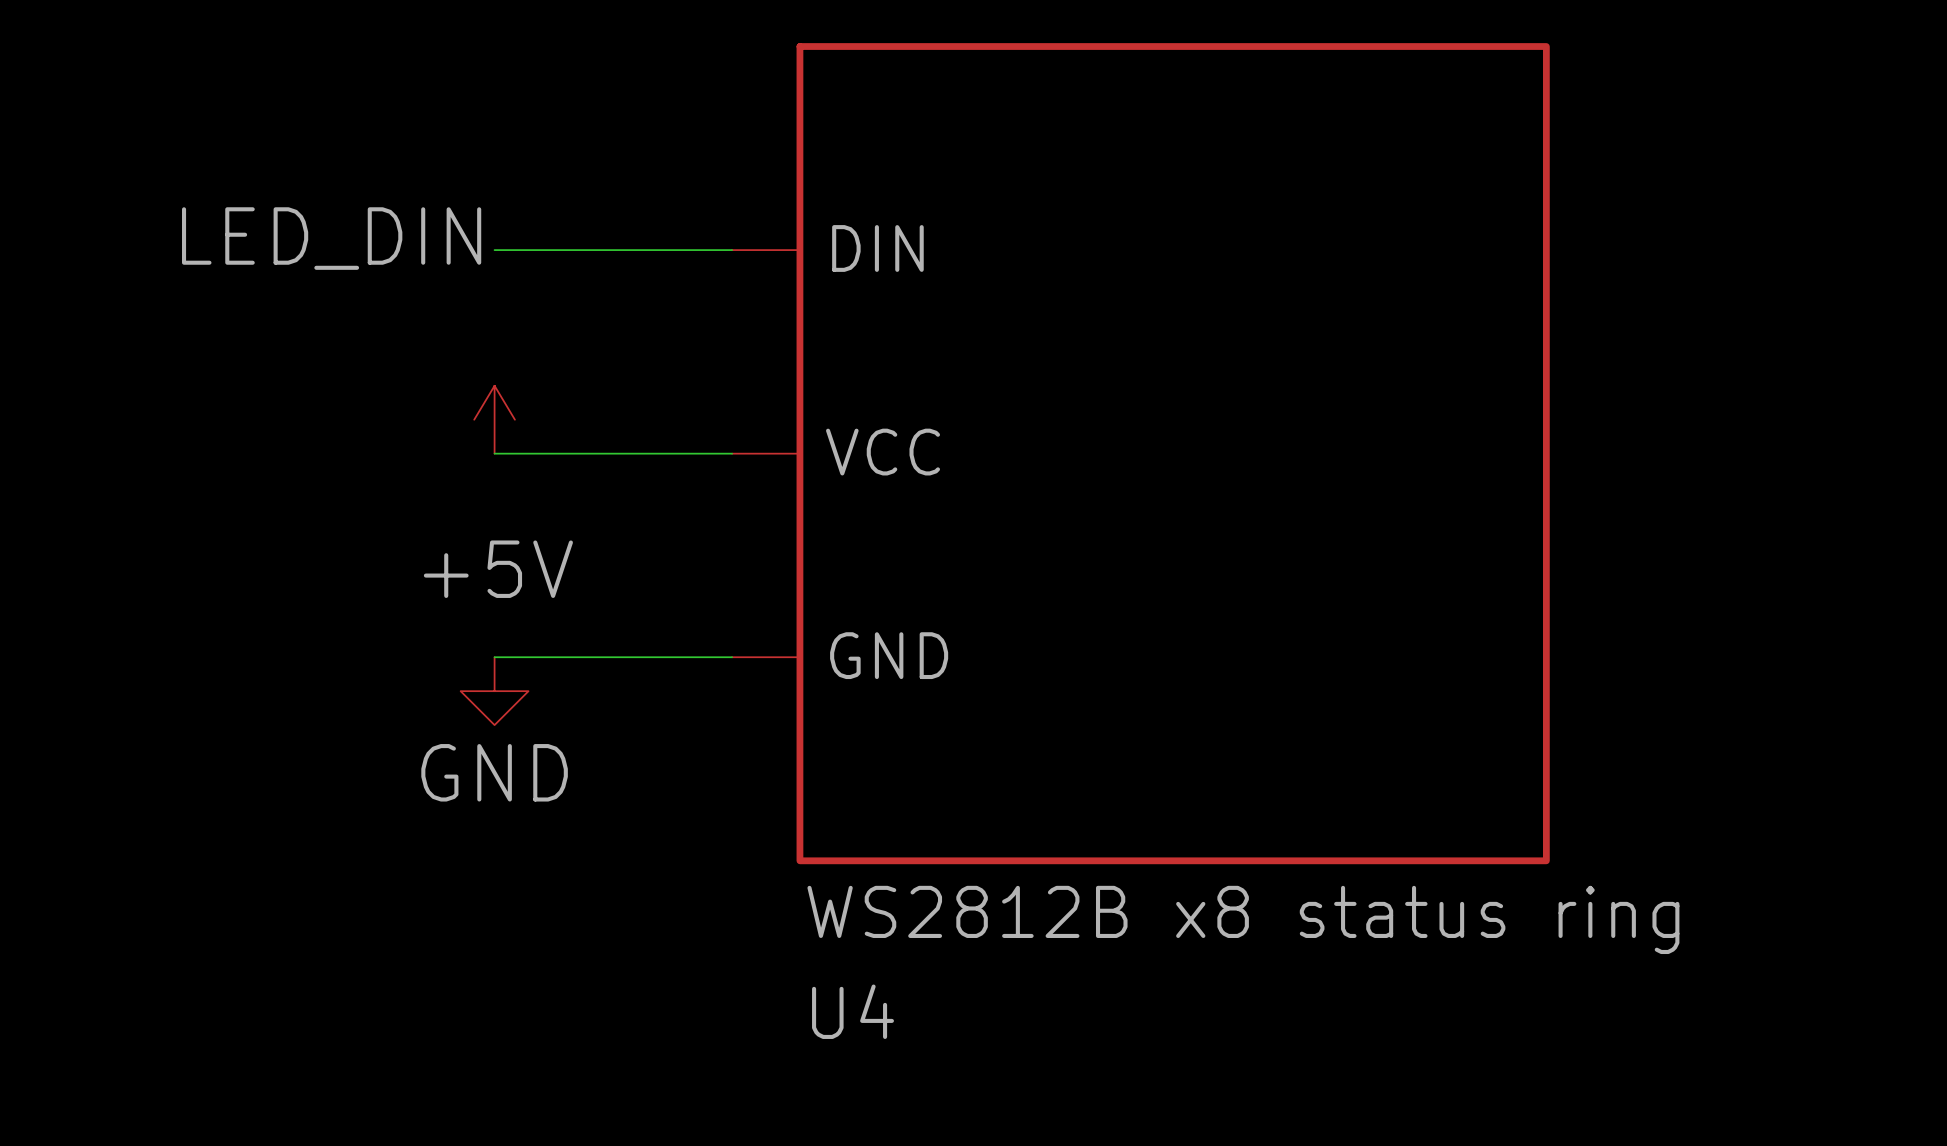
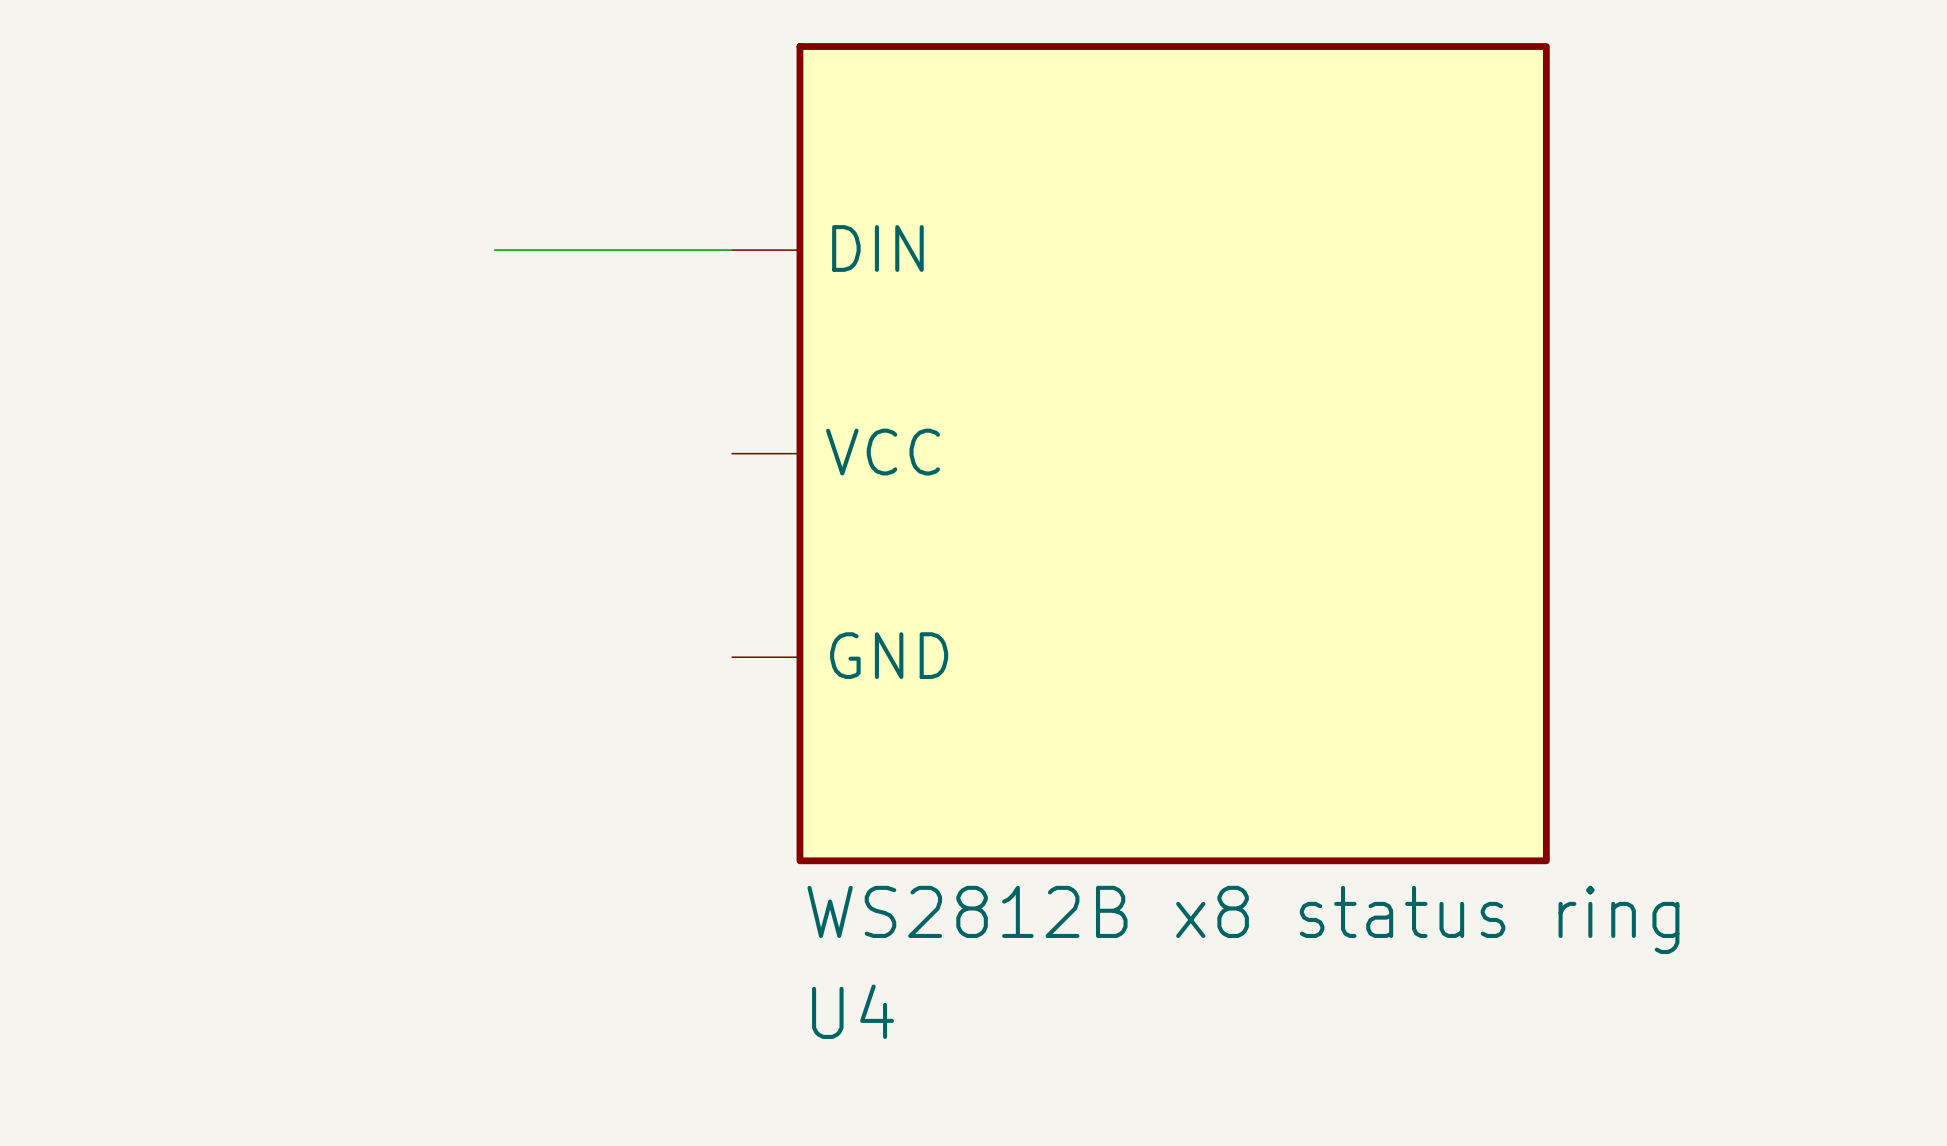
label: LED_DIN (331, 238) -> none
power symbol: +5V (494, 419) -> none
wire: (494, 453) (732, 453) -> none
wire: (494, 657) (732, 657) -> none
power symbol: GND (494, 691) -> none

